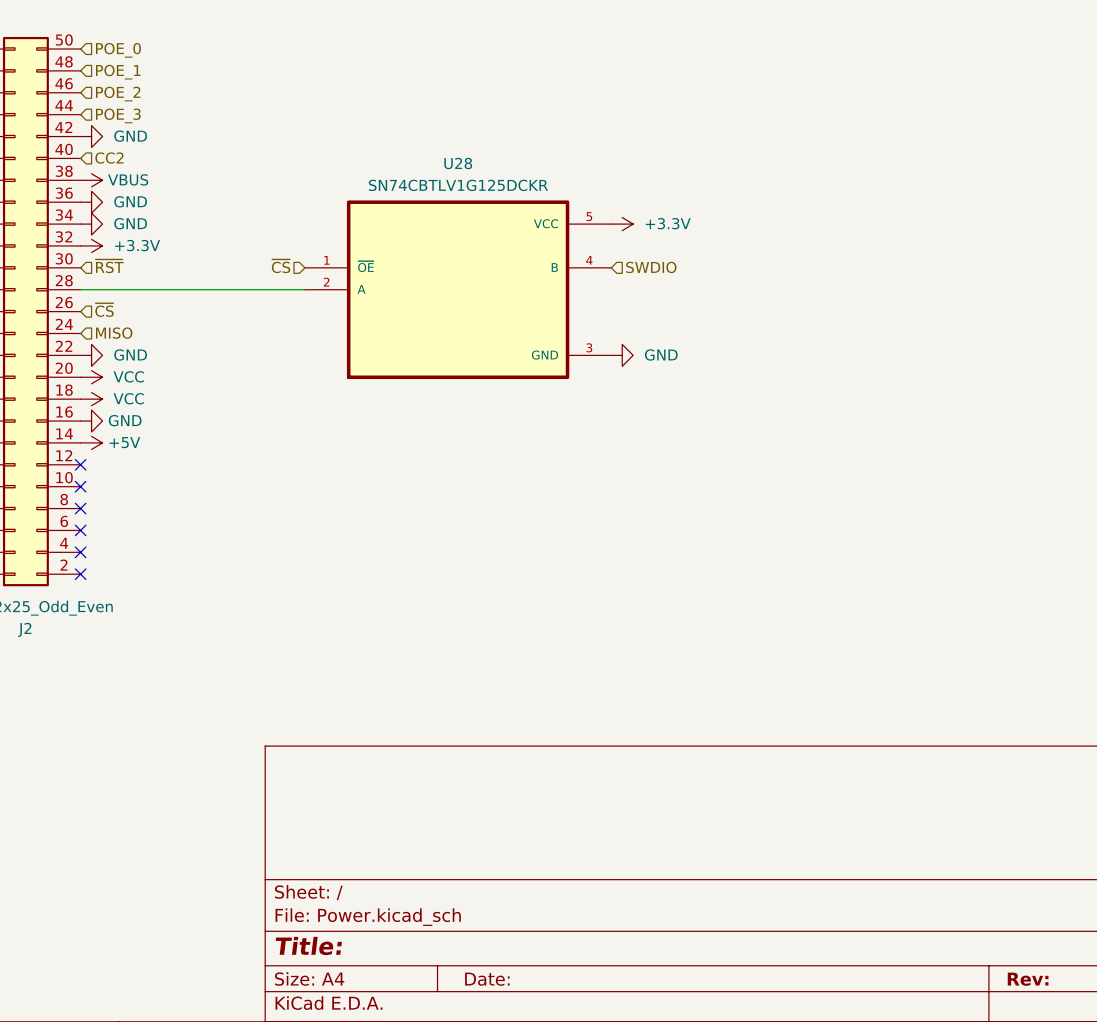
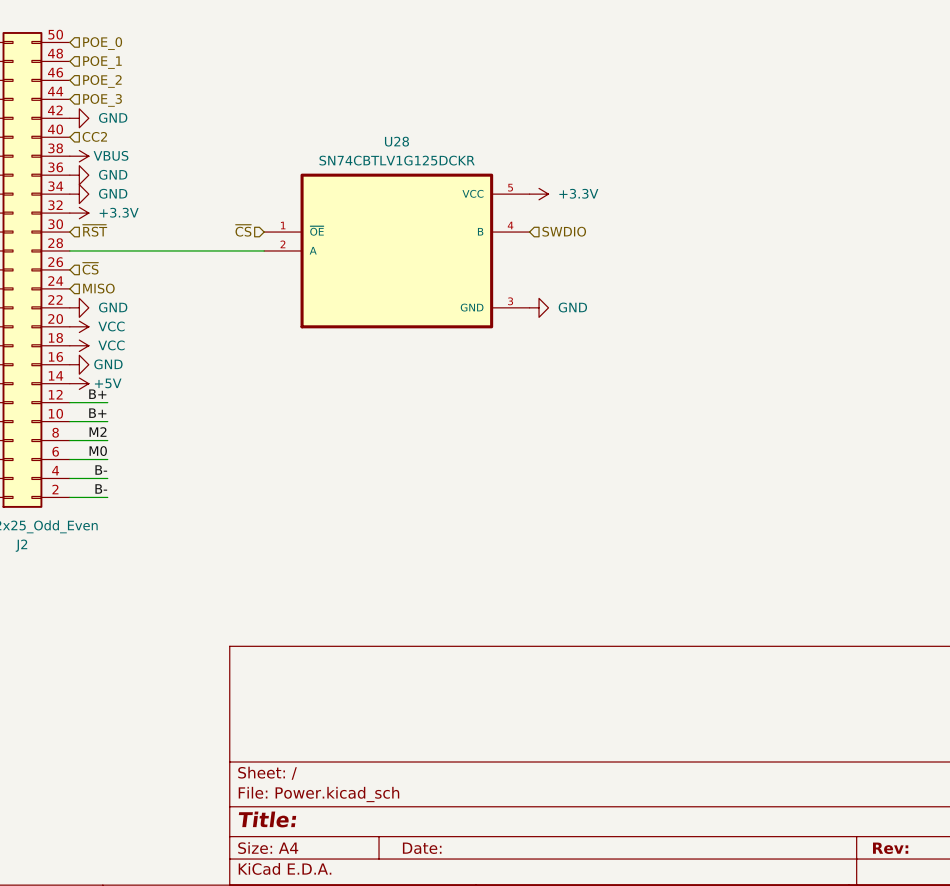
label: none -> B+ (97, 394)
wire: none -> (69, 402) (107, 402)
no-connect mark: (80, 464) -> none
label: none -> B+ (97, 413)
wire: none -> (69, 421) (107, 421)
no-connect mark: (80, 486) -> none
label: none -> M2 (98, 432)
wire: none -> (69, 440) (107, 440)
no-connect mark: (80, 508) -> none
label: none -> M0 (98, 451)
wire: none -> (69, 459) (107, 459)
no-connect mark: (80, 530) -> none
label: none -> B- (101, 470)
wire: none -> (69, 478) (107, 478)
no-connect mark: (80, 552) -> none
label: none -> B- (101, 488)
wire: none -> (69, 497) (107, 497)
no-connect mark: (80, 574) -> none

